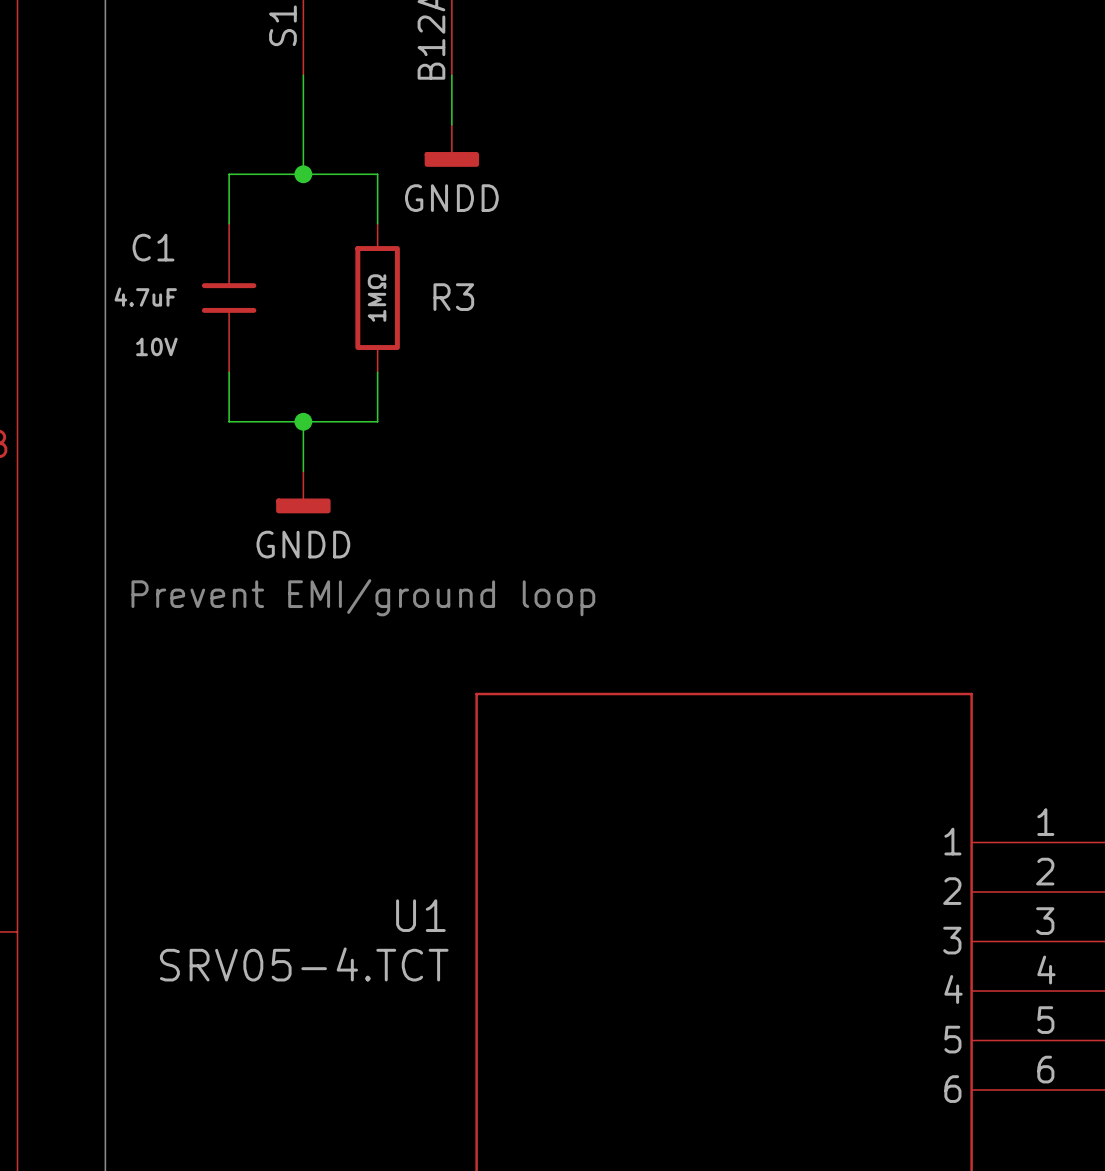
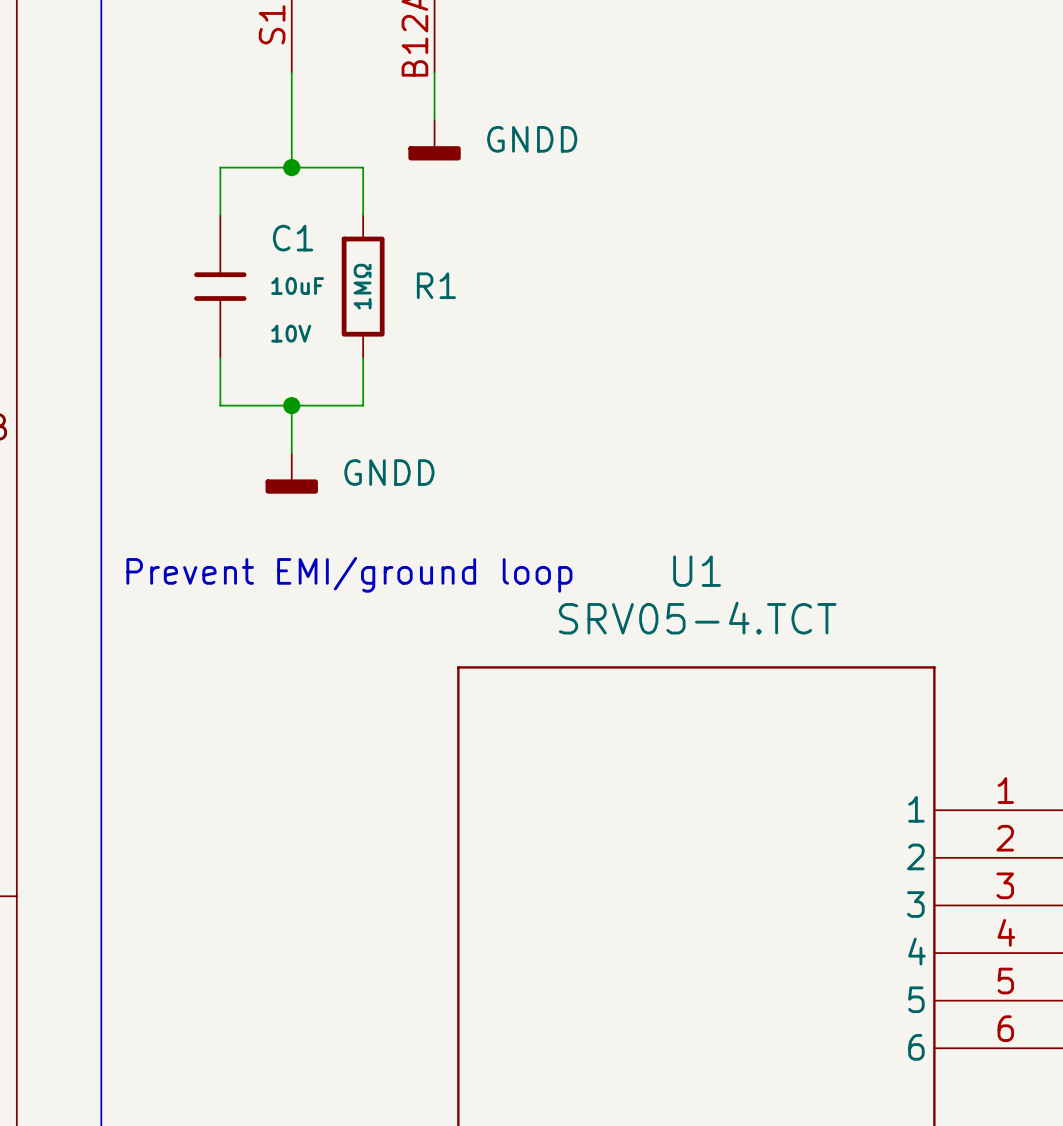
power symbol text position: GNDD (451, 198) -> GNDD (532, 139)
C1 name position: C1 (153, 247) -> C1 (293, 238)
C1 value: 4.7uF (145, 297) -> 10uF (297, 286)
R3 name: R3 (453, 297) -> R1 (436, 285)
C1 text position: 10V (156, 346) -> 10V (291, 333)
power symbol text position: GNDD (303, 544) -> GNDD (389, 472)
U1 name position: U1 (420, 915) -> U1 (697, 571)
U1 value position: SRV05-4.TCT (304, 964) -> SRV05-4.TCT (697, 618)

